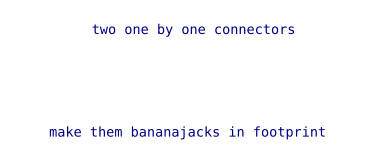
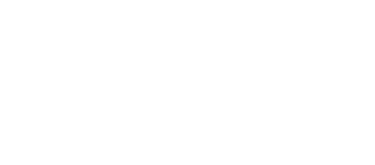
text: two one by one connectors (193, 30) -> none
text: make them bananajacks in footprint (187, 132) -> none

